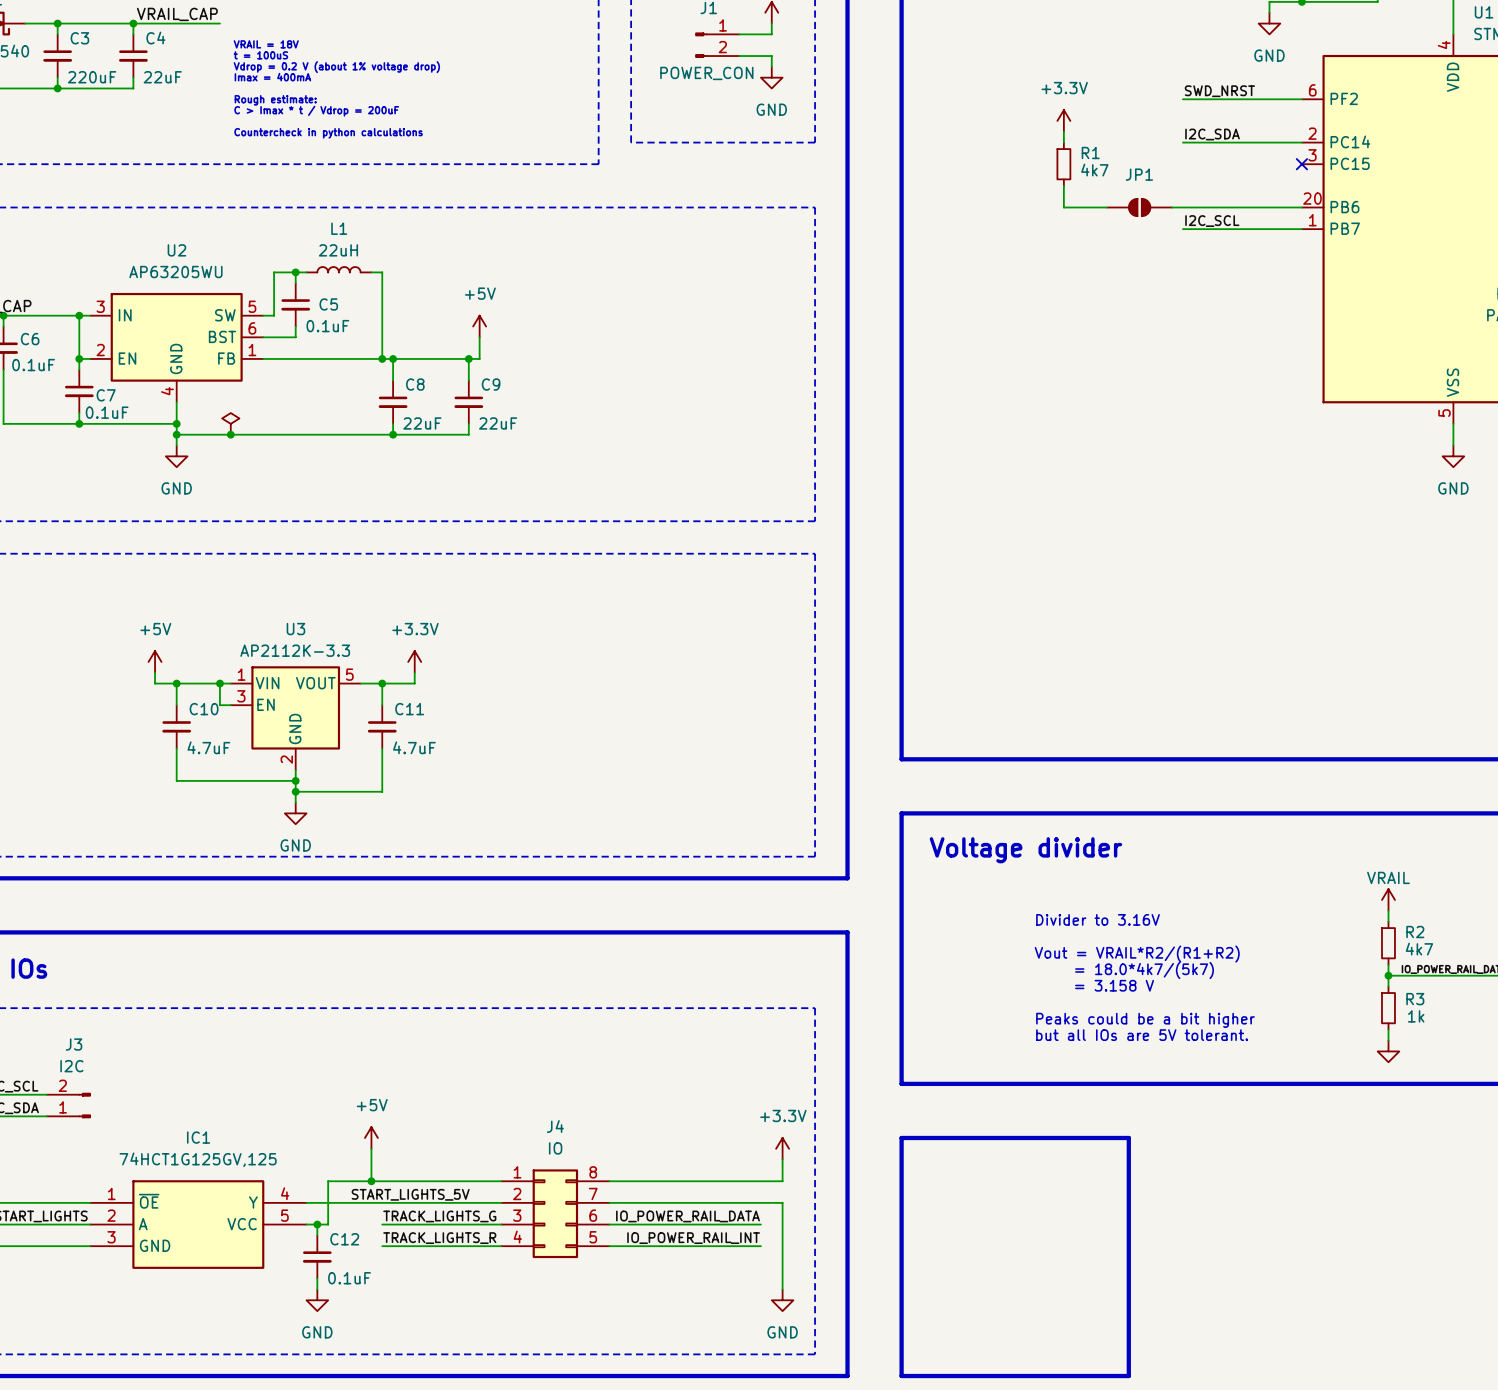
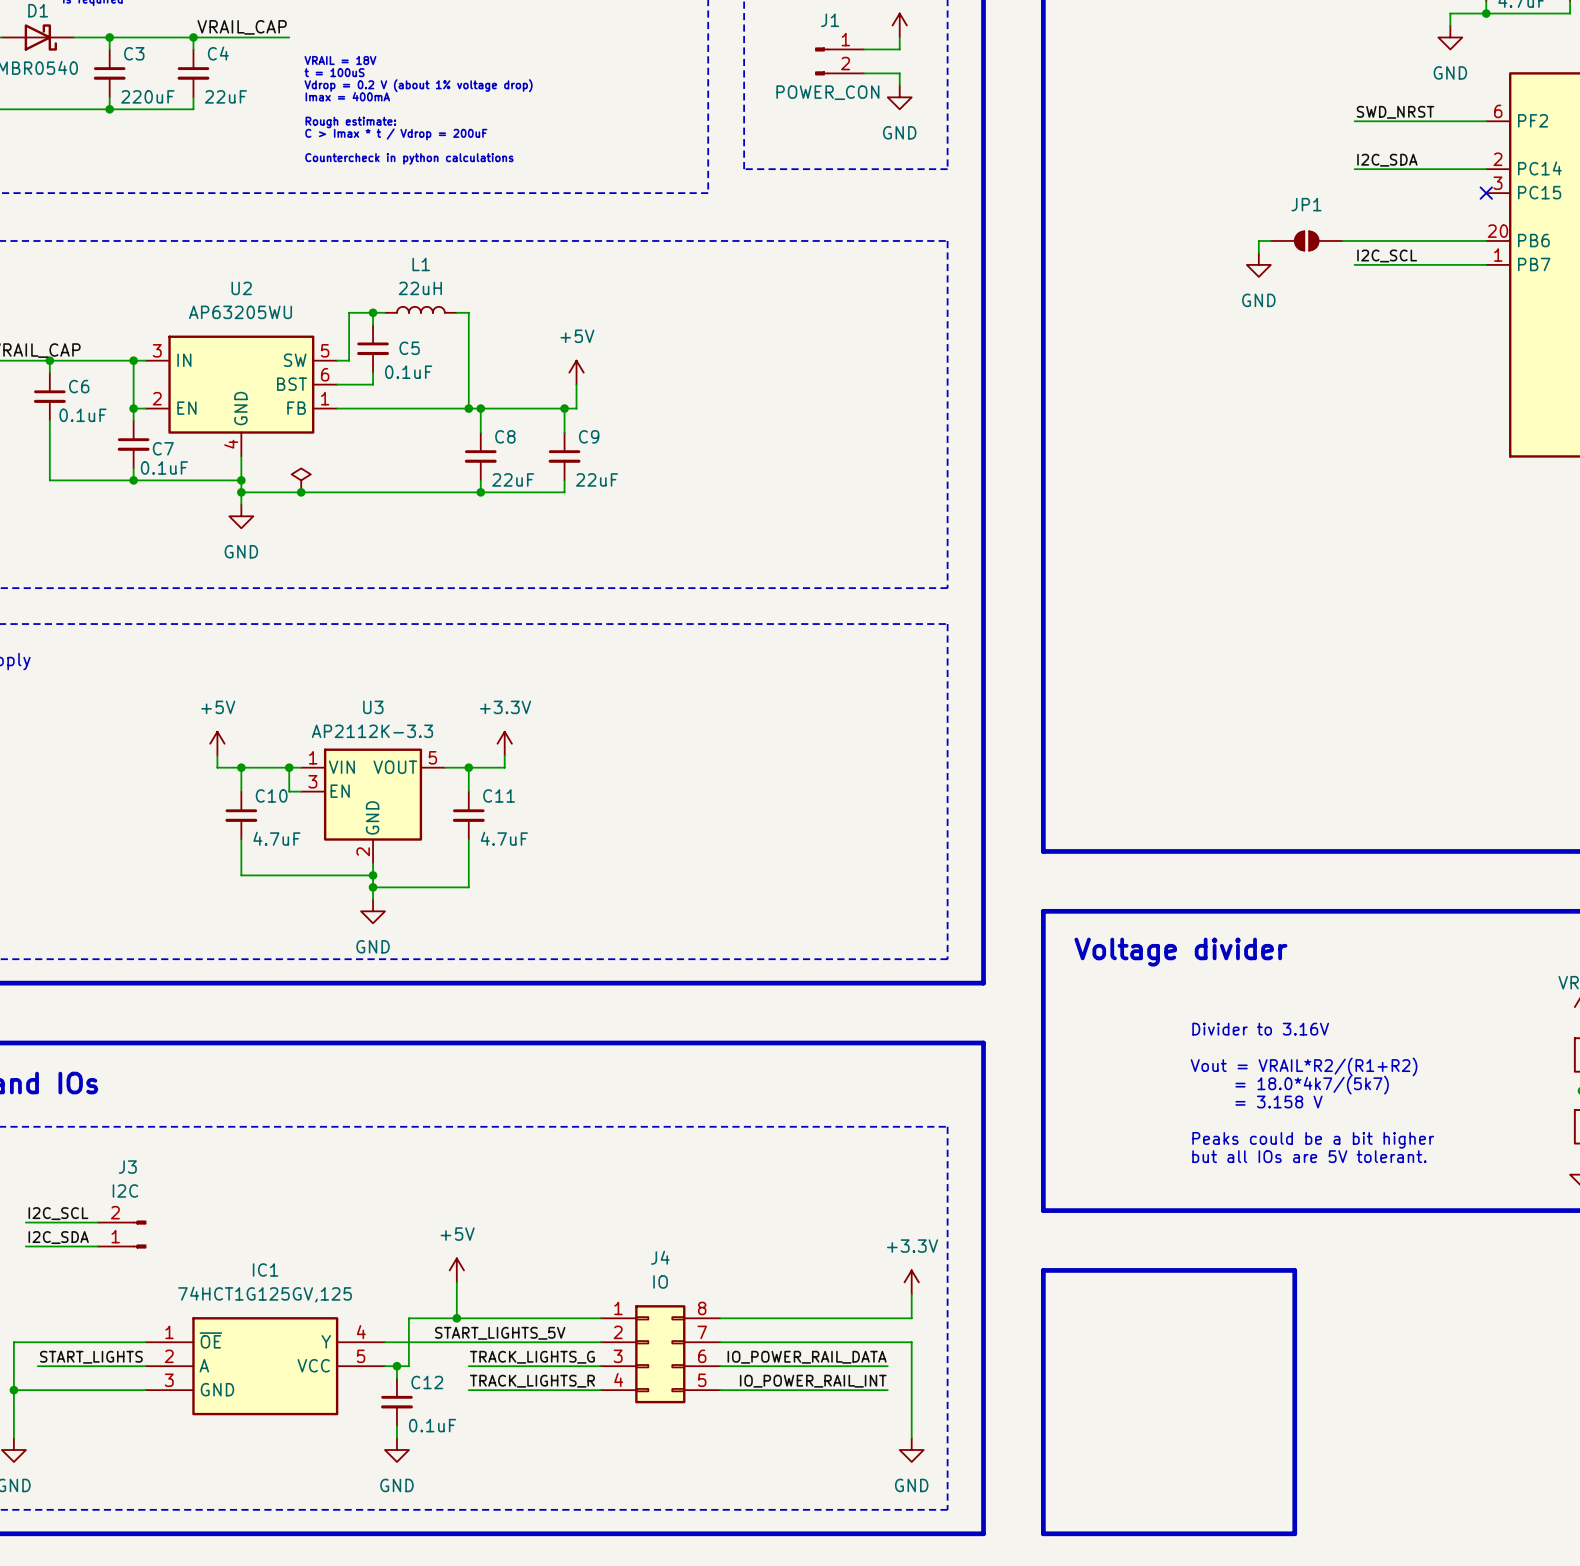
power symbol: +3.3V (1063, 120) -> none
wire: (1063, 131) (1063, 142) -> none
R1: 4k7 (1063, 164) -> none
wire: (1063, 185) (1063, 207) (1096, 207) -> (1258, 252) (1258, 240)
power symbol: none -> GND (1258, 264)

